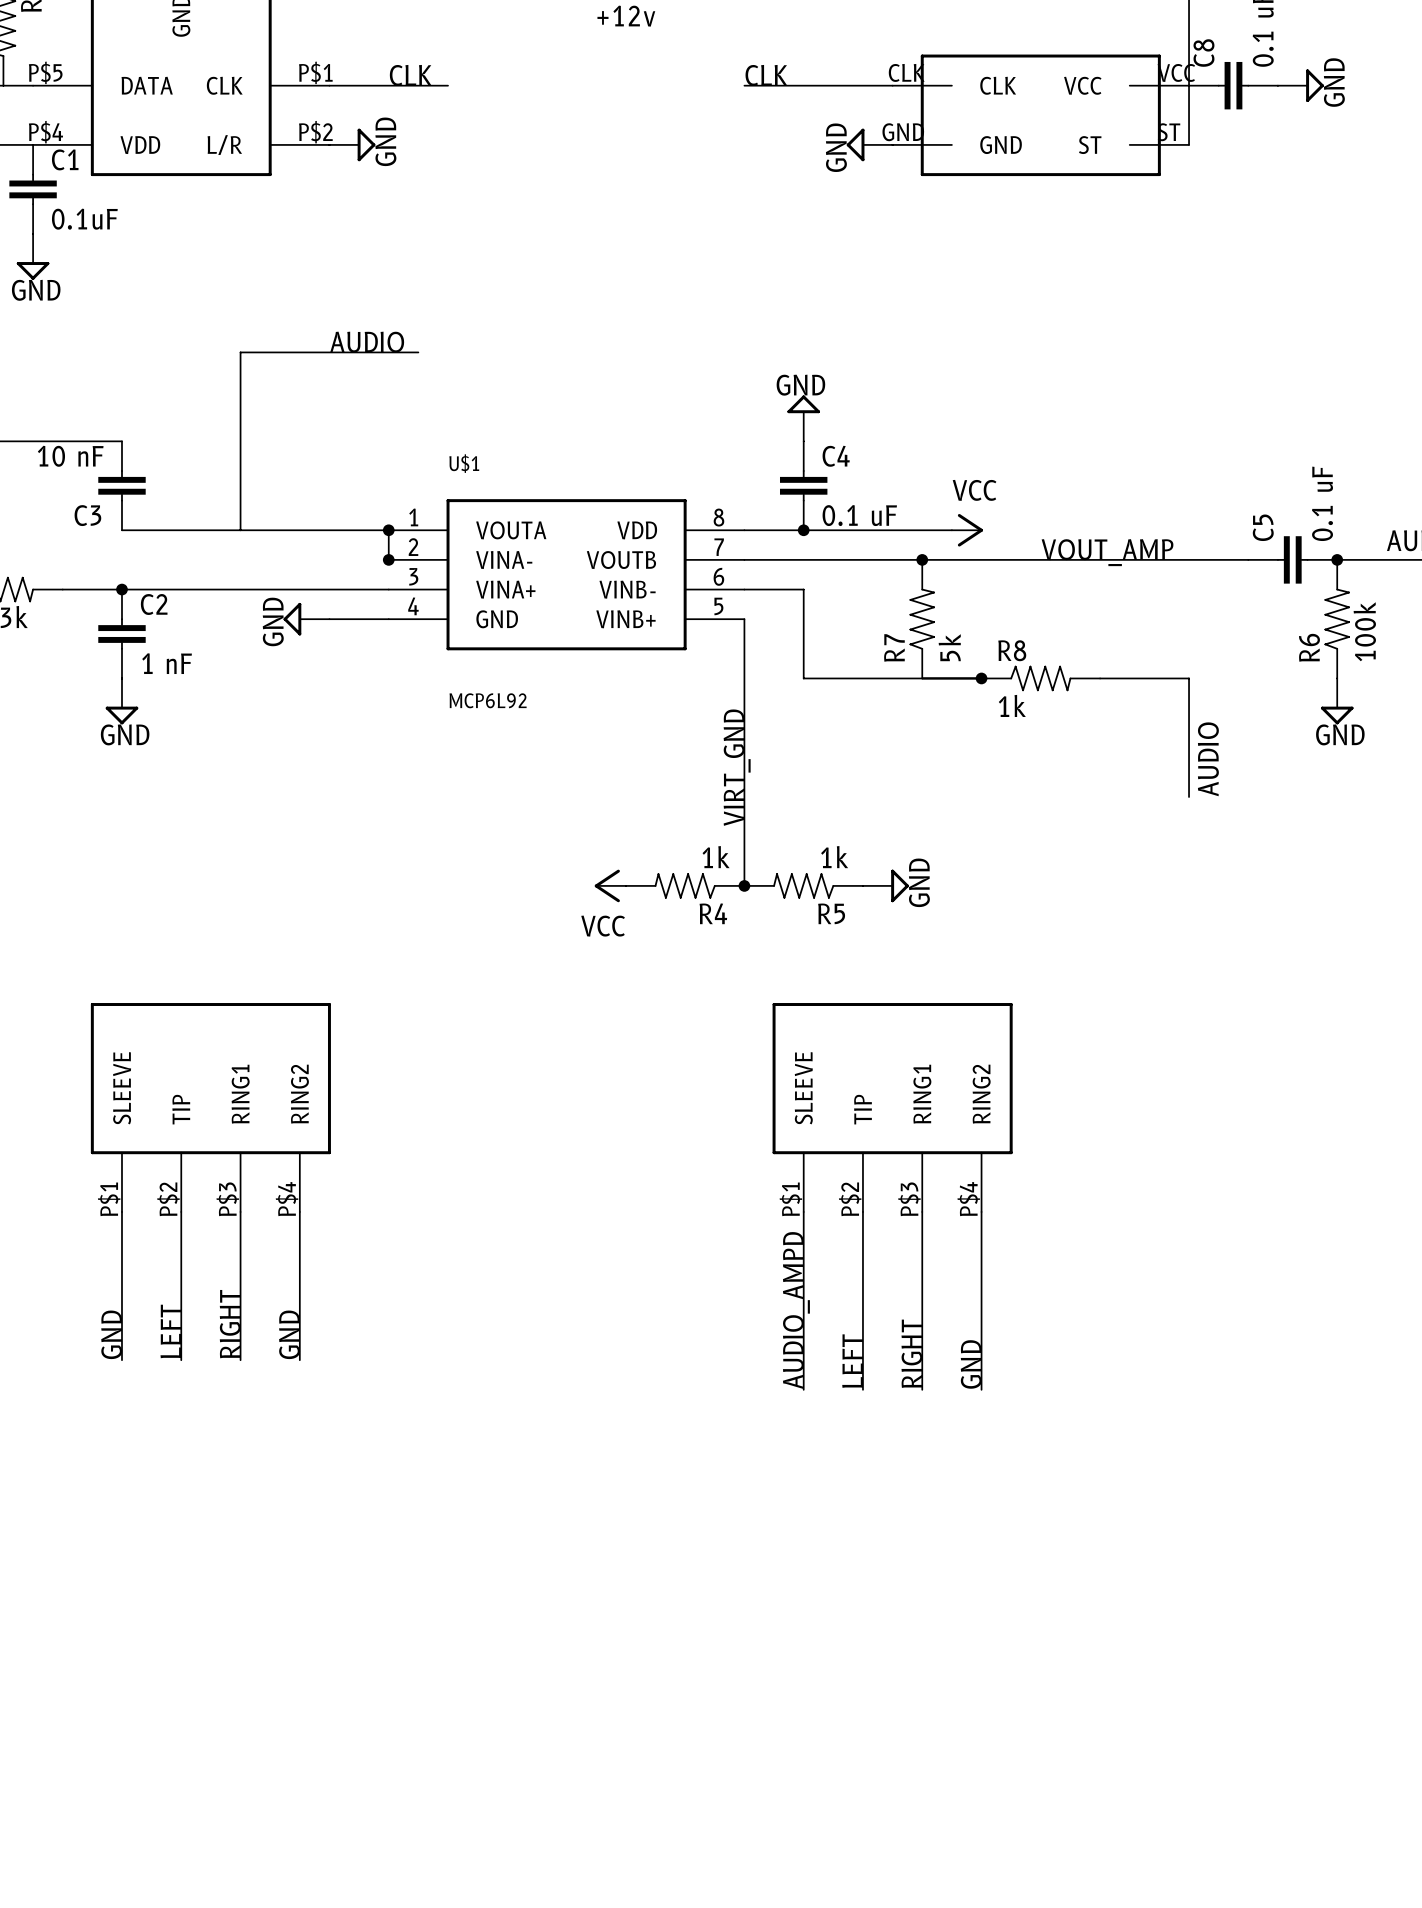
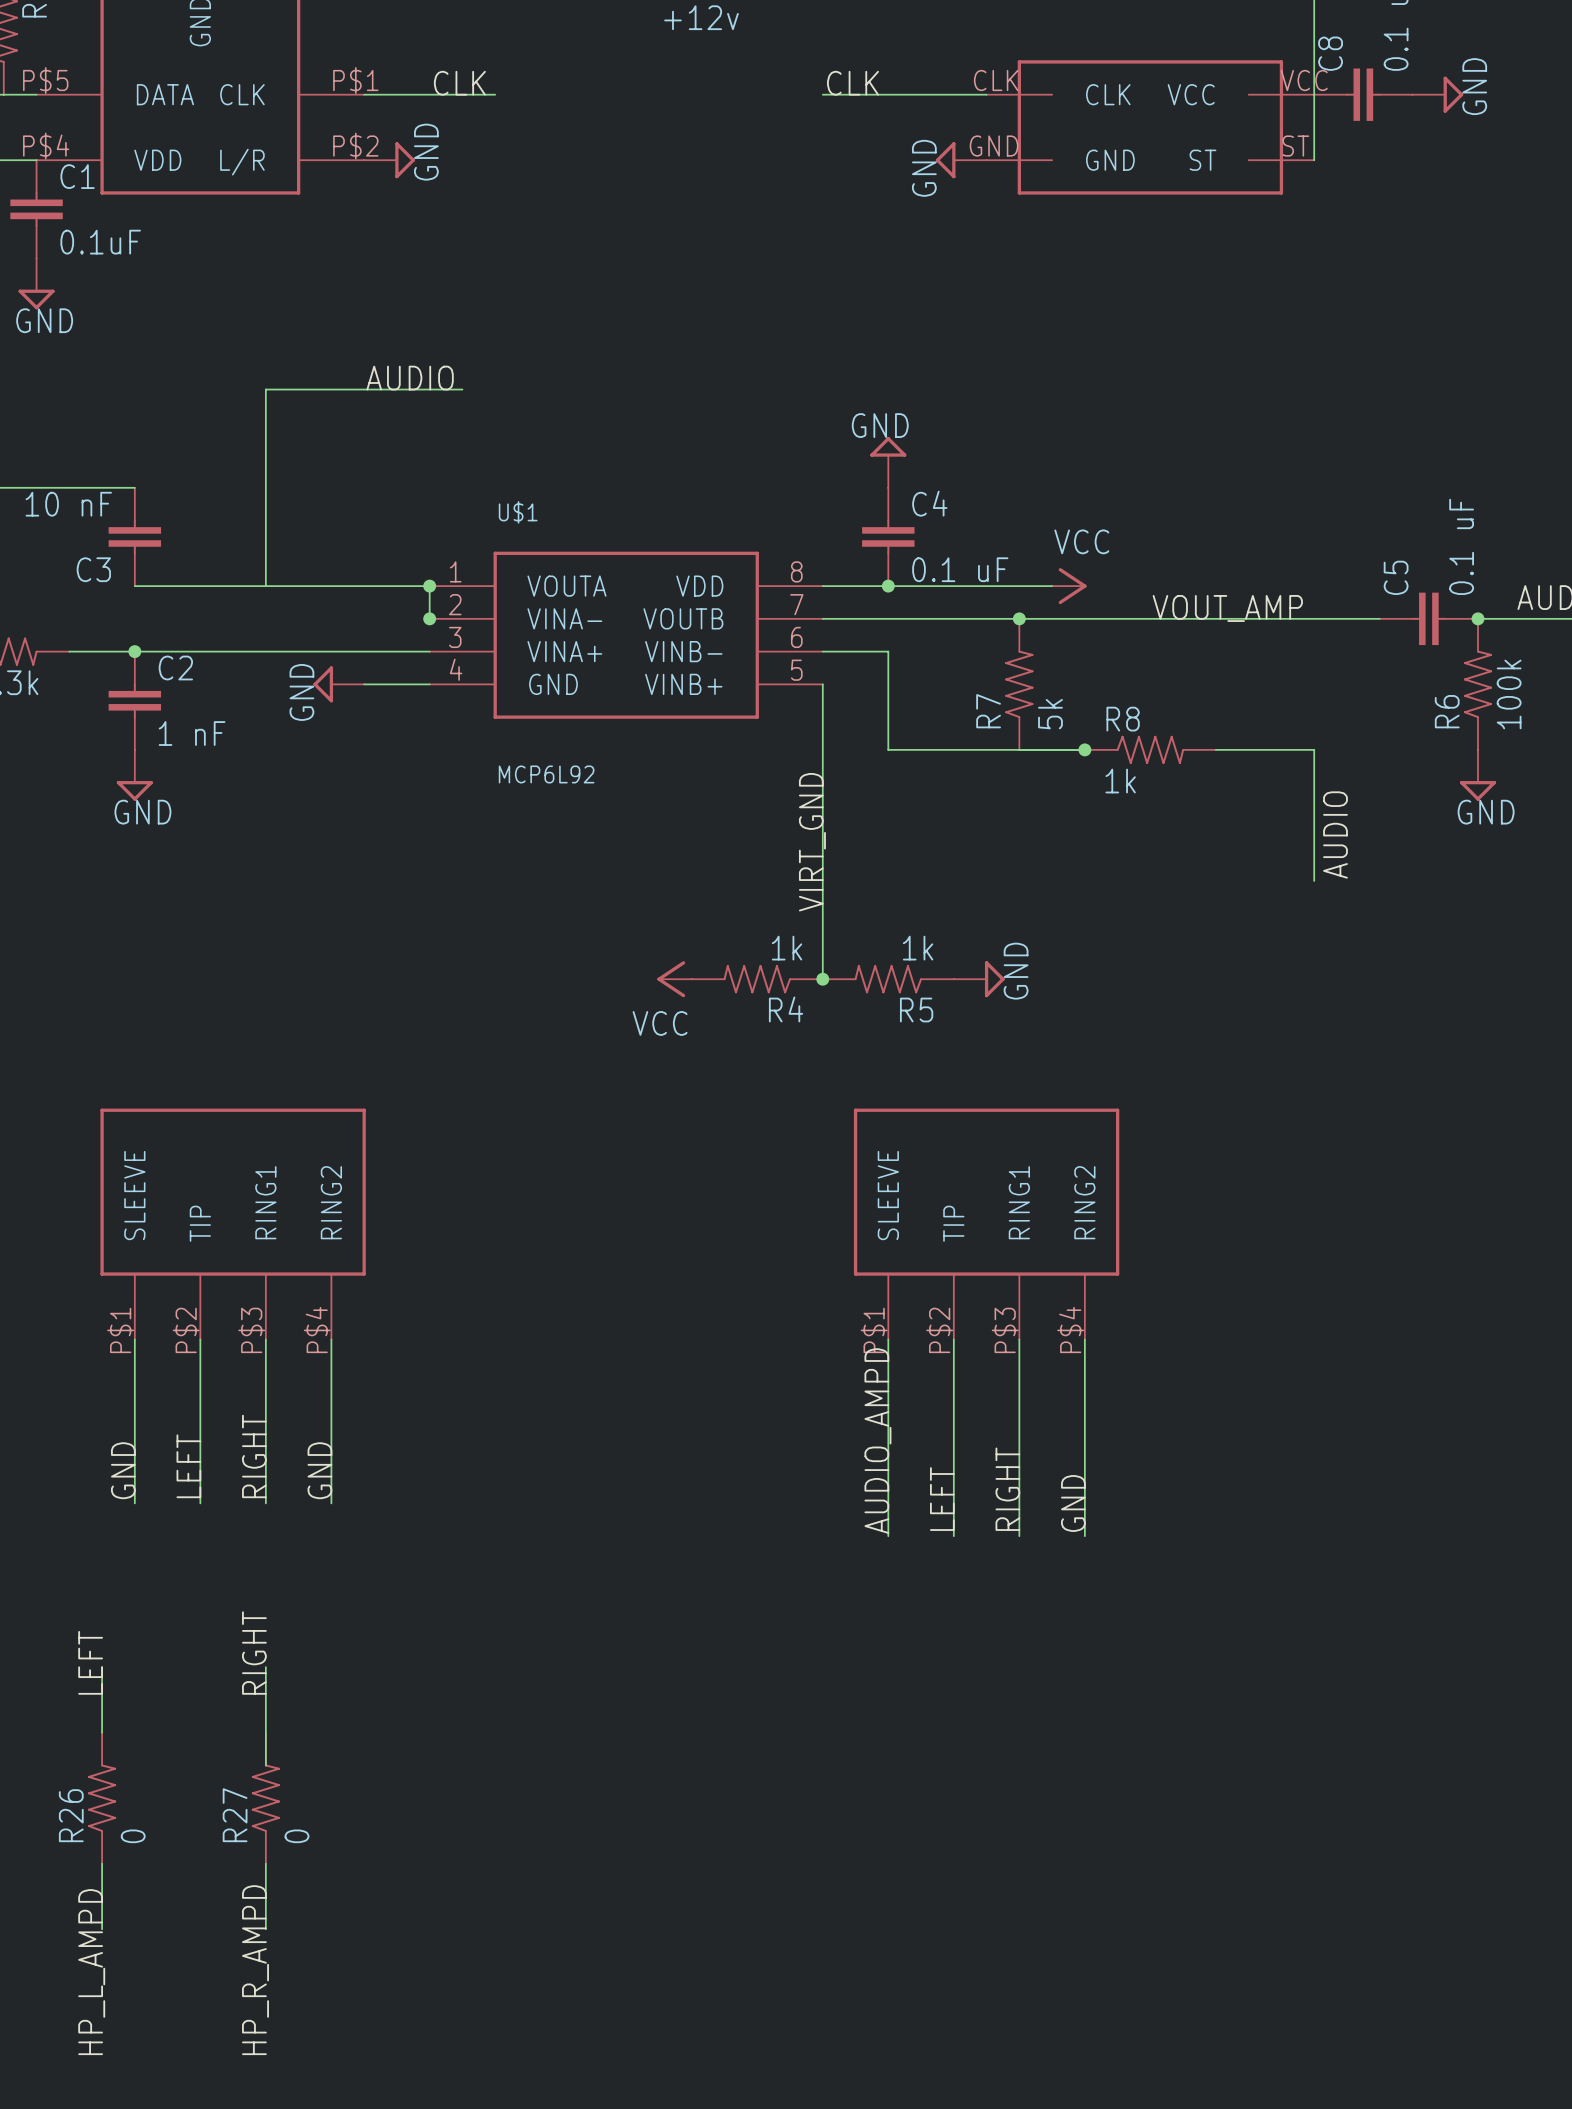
label: none -> RIGHT (254, 1653)
wire: none -> (102, 1667) (102, 1732)
wire: none -> (265, 1667) (265, 1765)
label: none -> LEFT (90, 1662)
R26: none -> 0 (102, 1798)
R27: none -> 0 (265, 1798)
wire: none -> (102, 1863) (102, 1929)
wire: none -> (265, 1863) (265, 1929)
label: none -> HP_R_AMPD (255, 1970)
label: none -> HP_L_AMPD (91, 1972)

